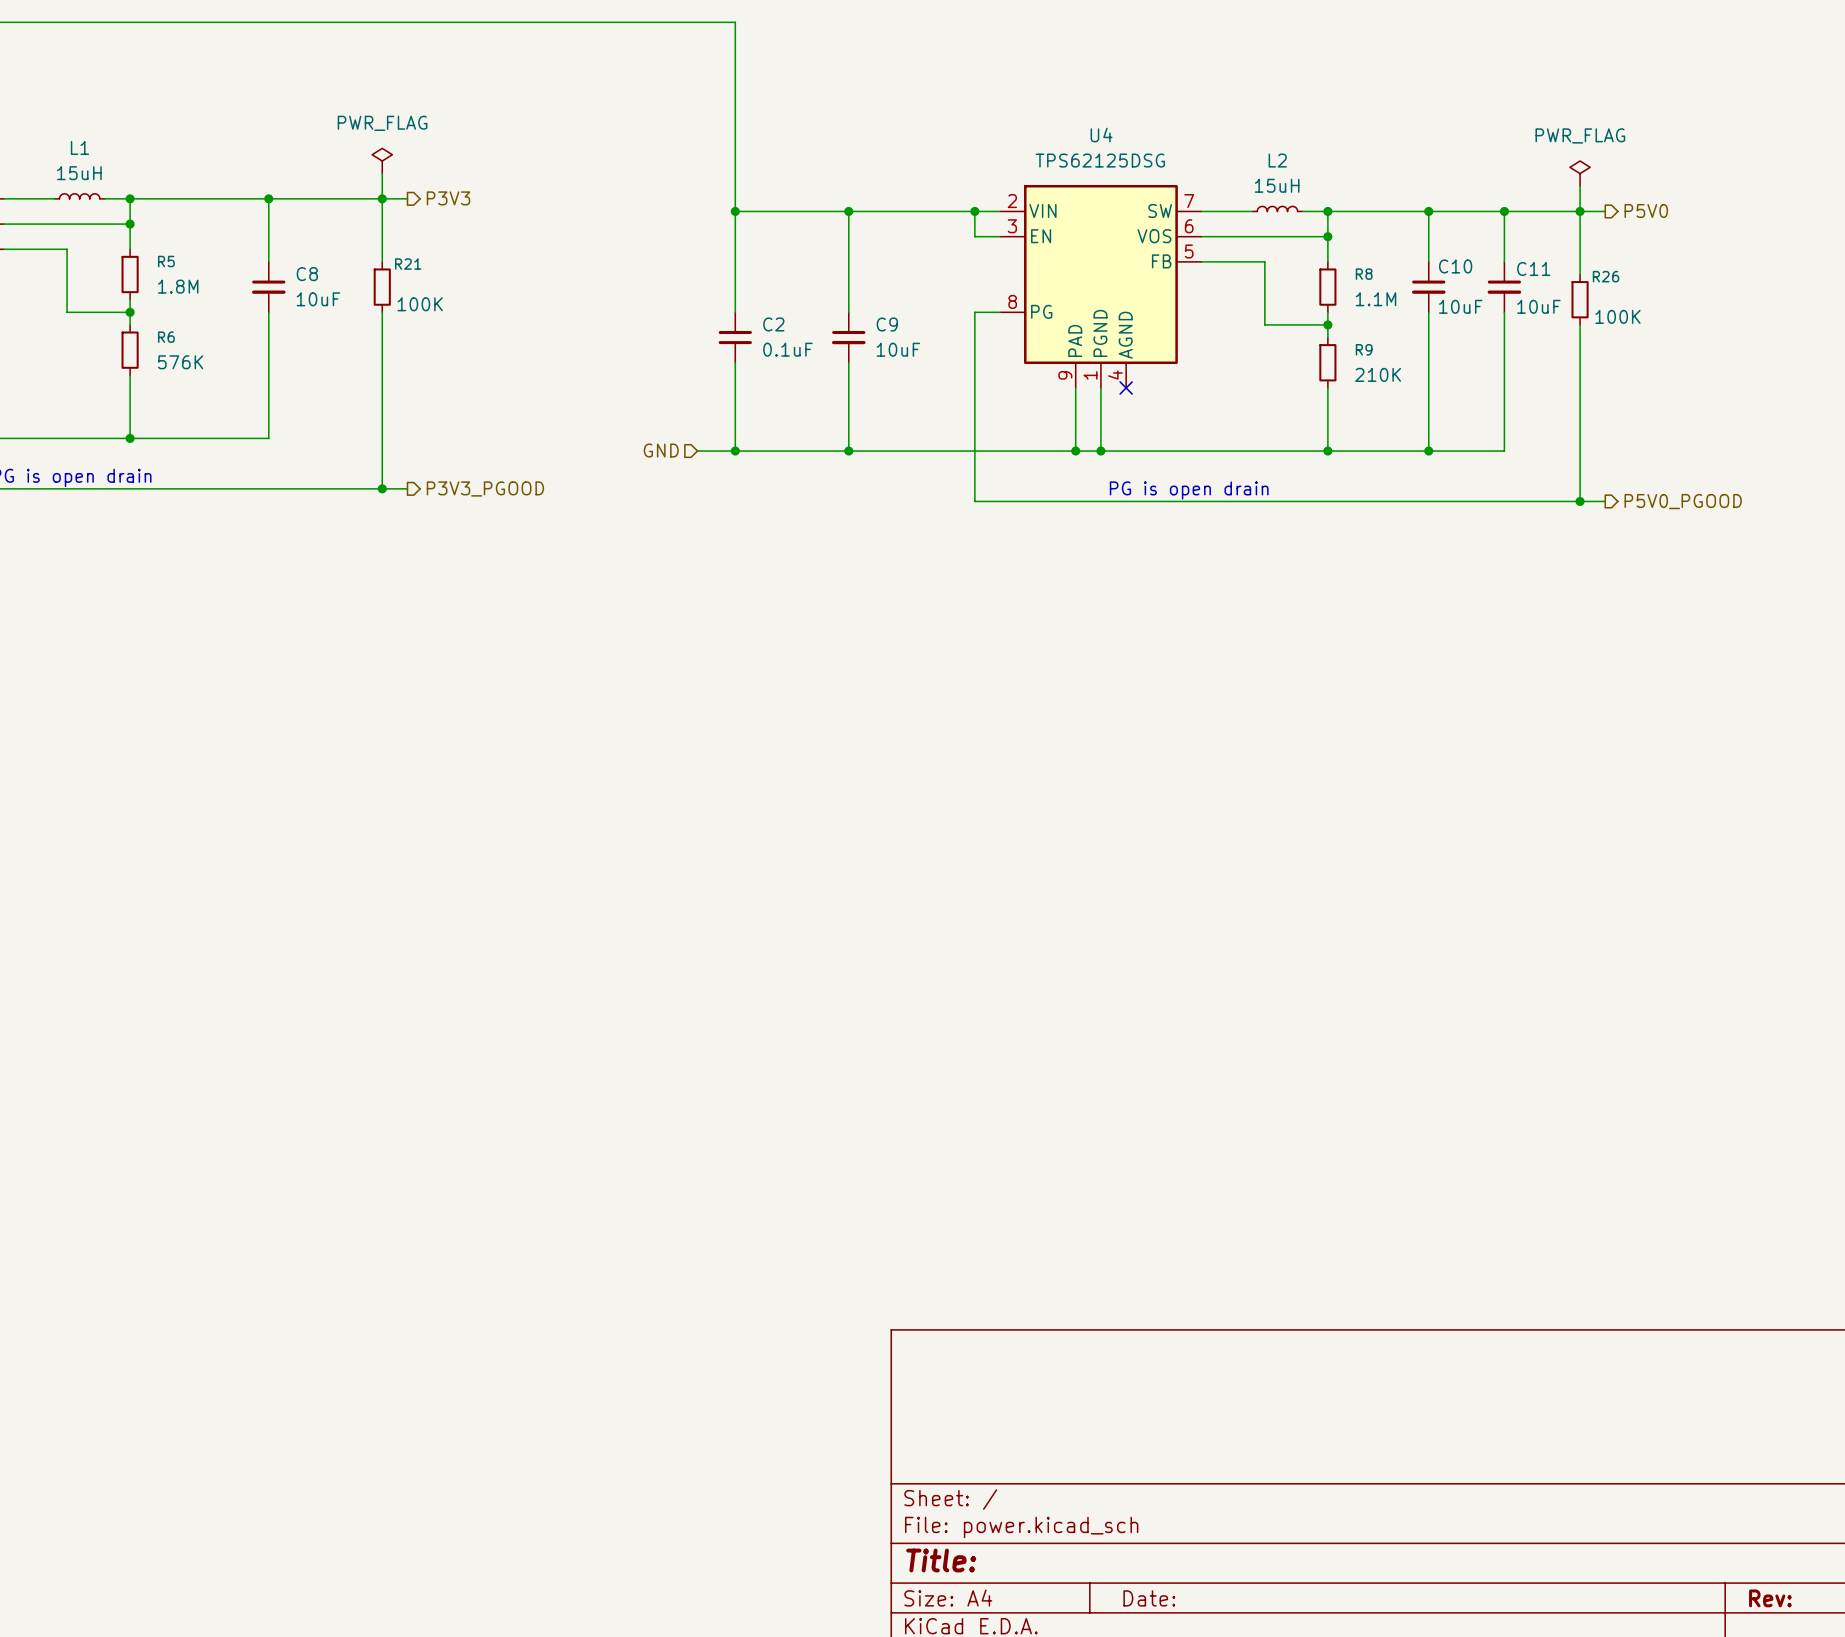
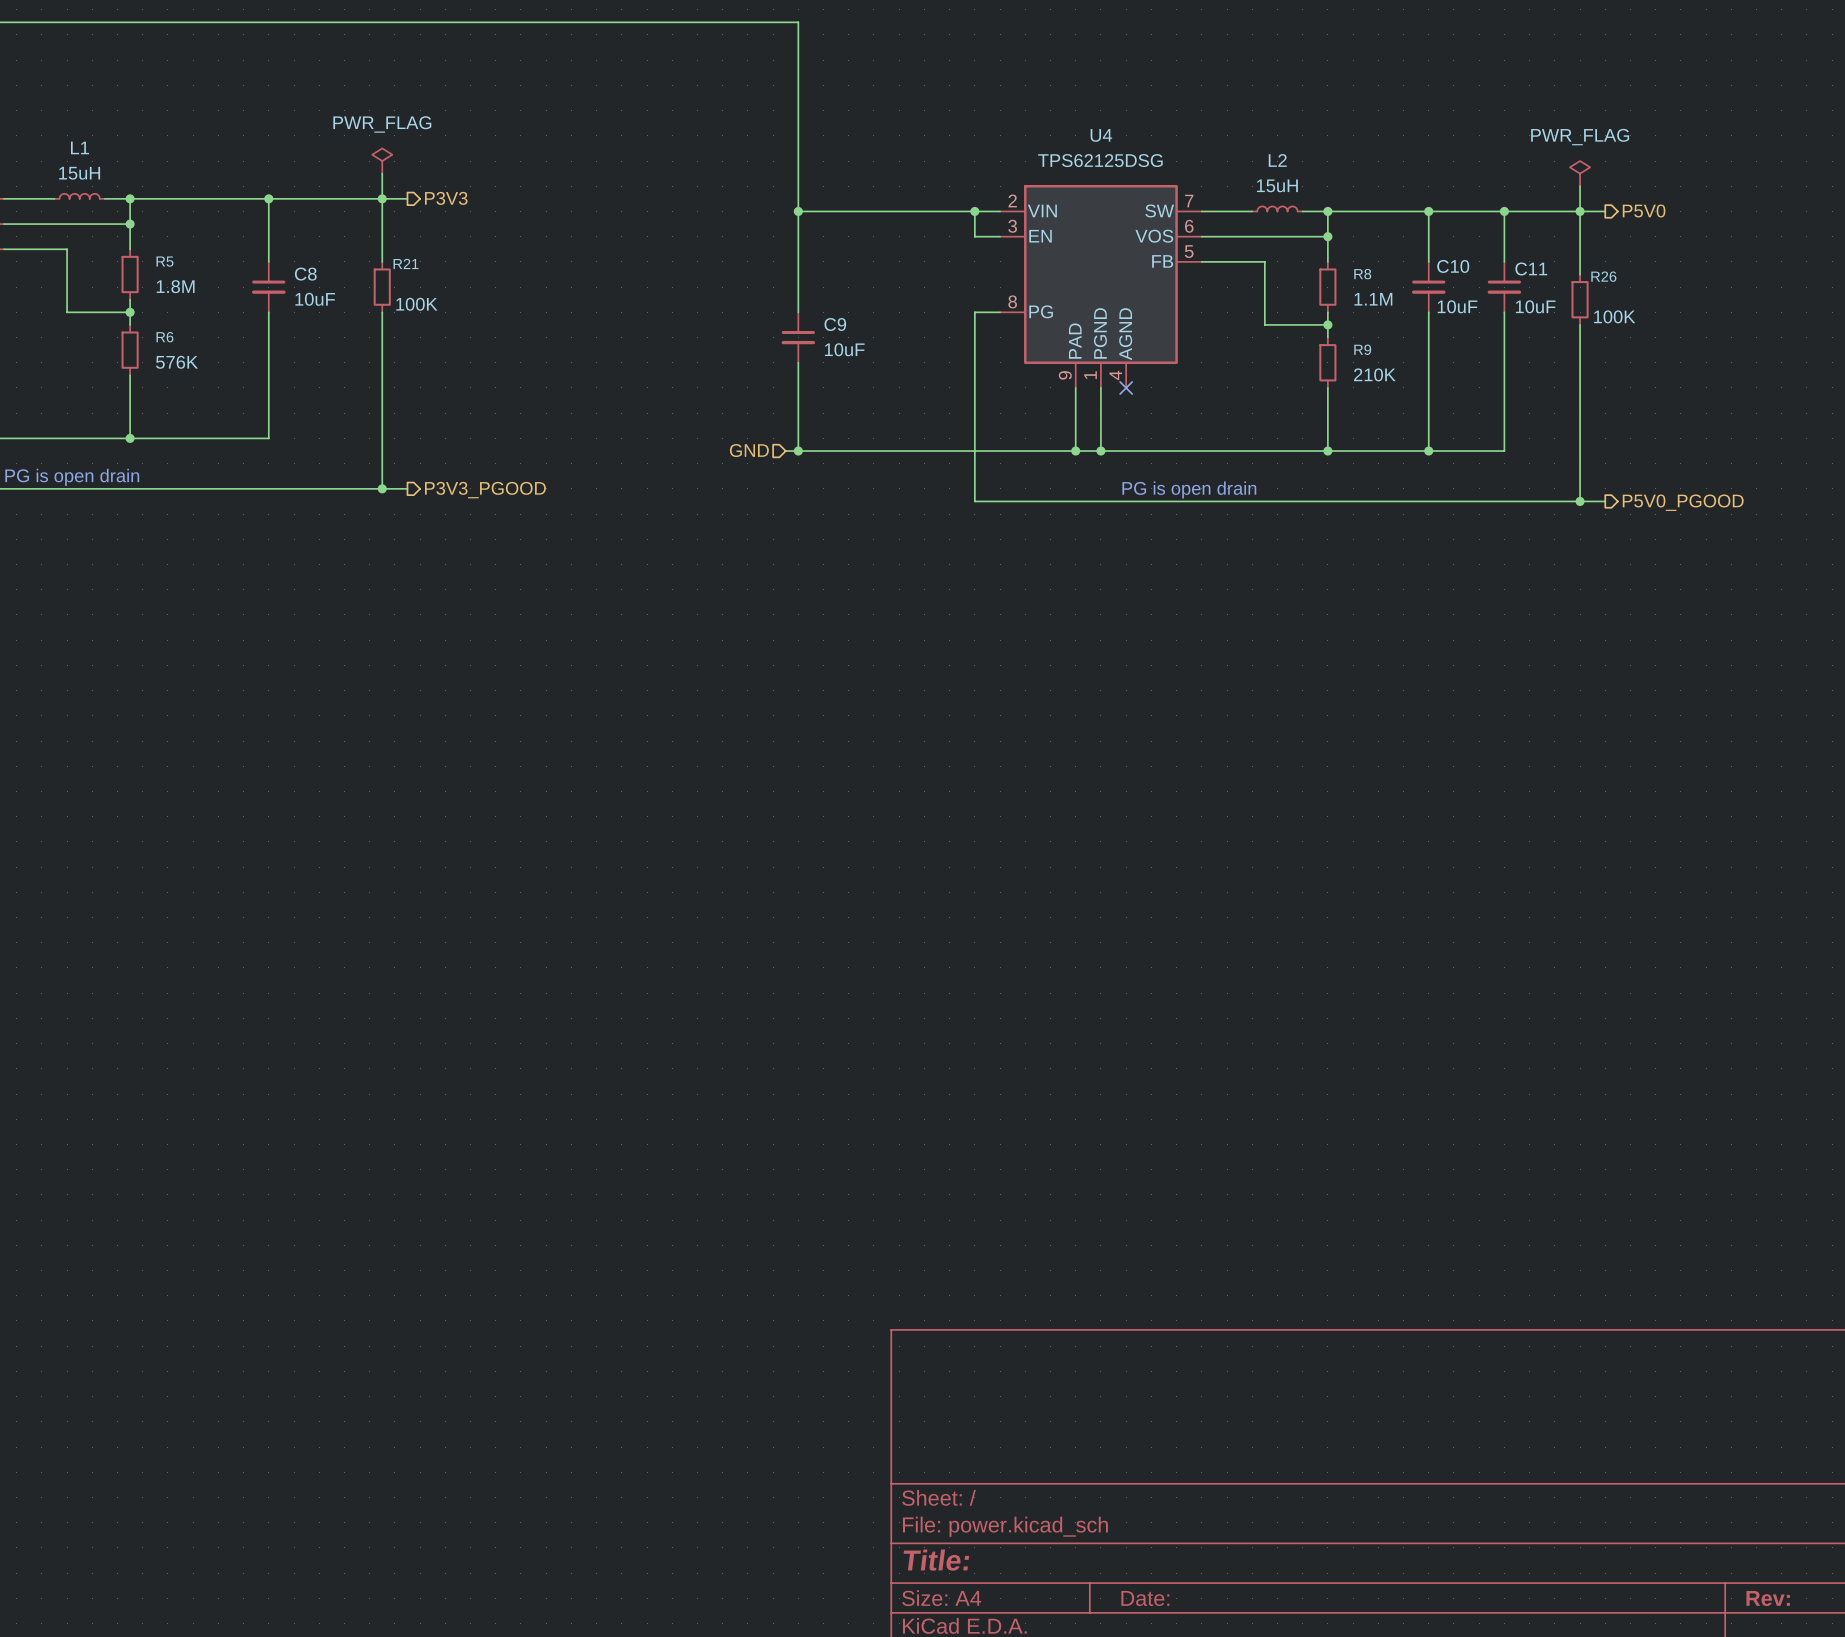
wire: (735, 22) (735, 312) -> (735, 22) (798, 22) (798, 312)
wire: (735, 211) (798, 211) -> none
junction: (735, 211) -> none
junction: none -> (798, 211)
wire: (848, 211) (848, 312) -> none
junction: (848, 211) -> none
C2: 0.1uF (735, 337) -> none
C9 position: (848, 337) -> (798, 337)
wire: (735, 362) (735, 451) -> none
wire: (848, 362) (848, 451) -> (798, 362) (798, 451)
hierarchical label position: GND (661, 450) -> GND (749, 450)
wire: (697, 451) (785, 451) -> none
junction: (735, 451) -> none
junction: none -> (798, 451)
junction: (848, 451) -> none

